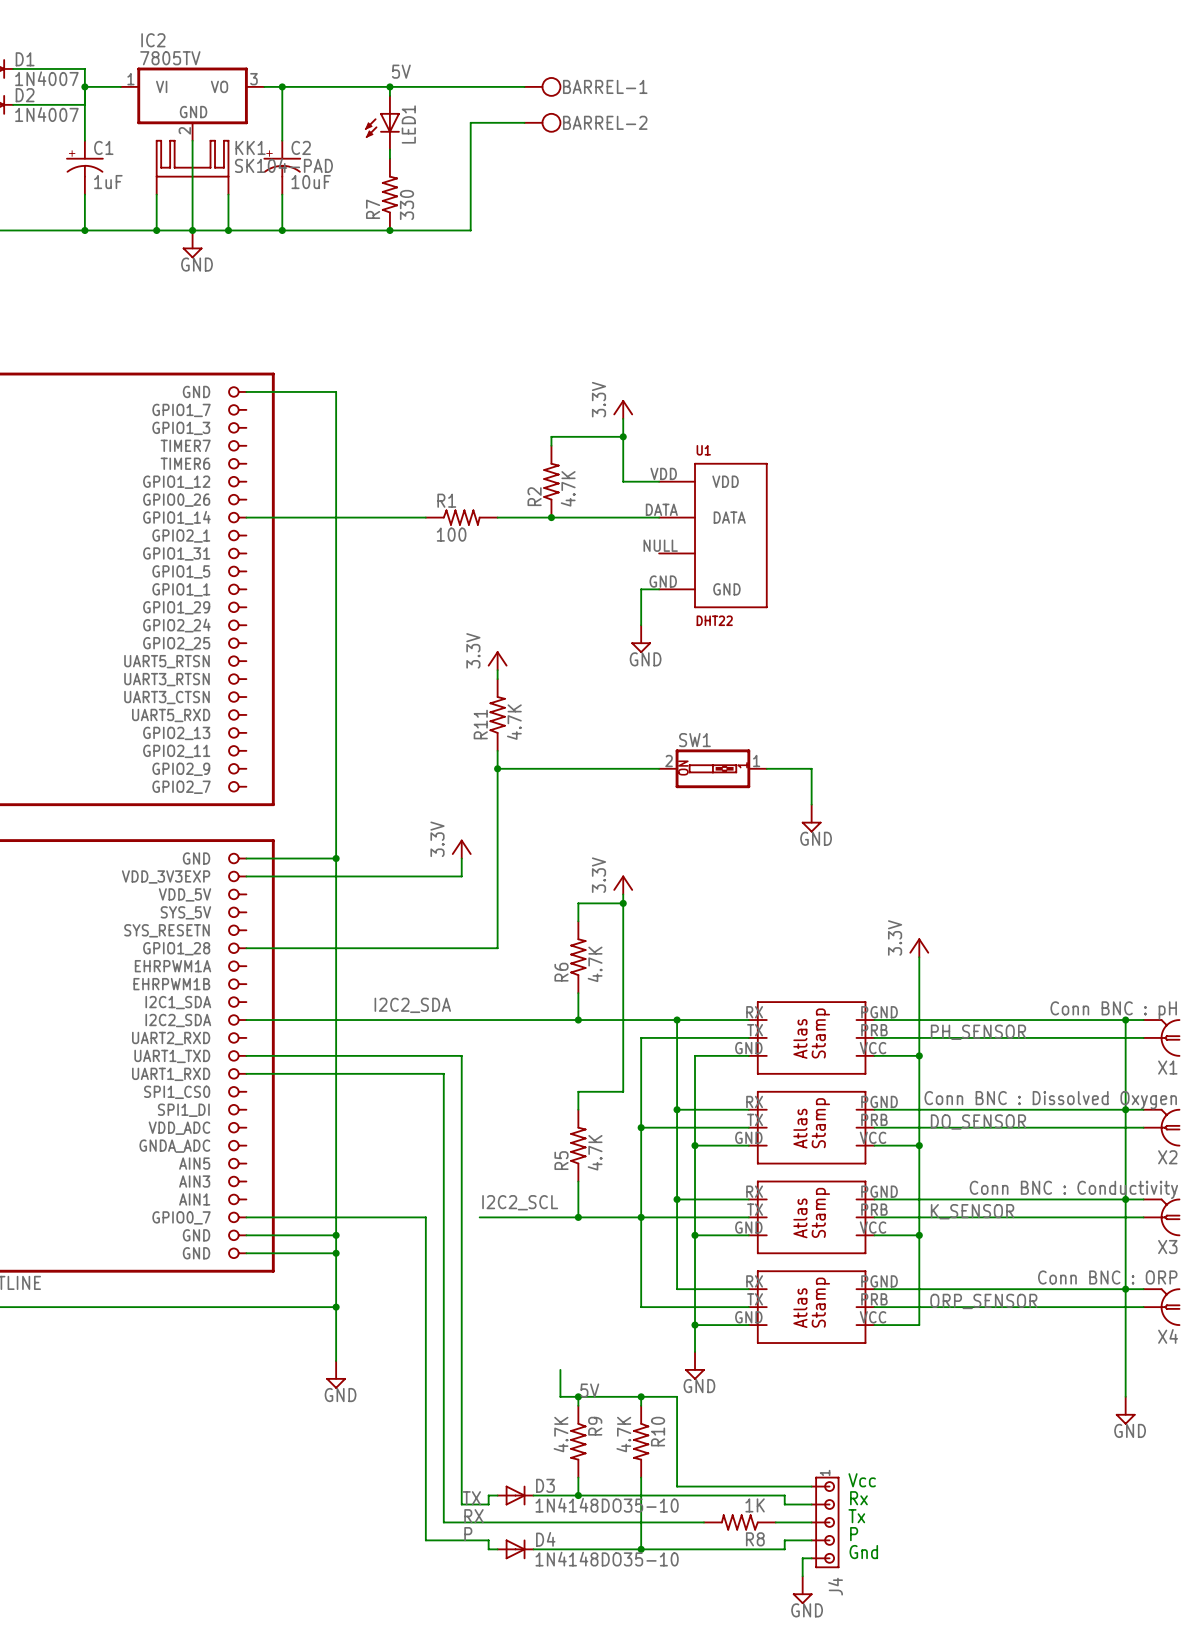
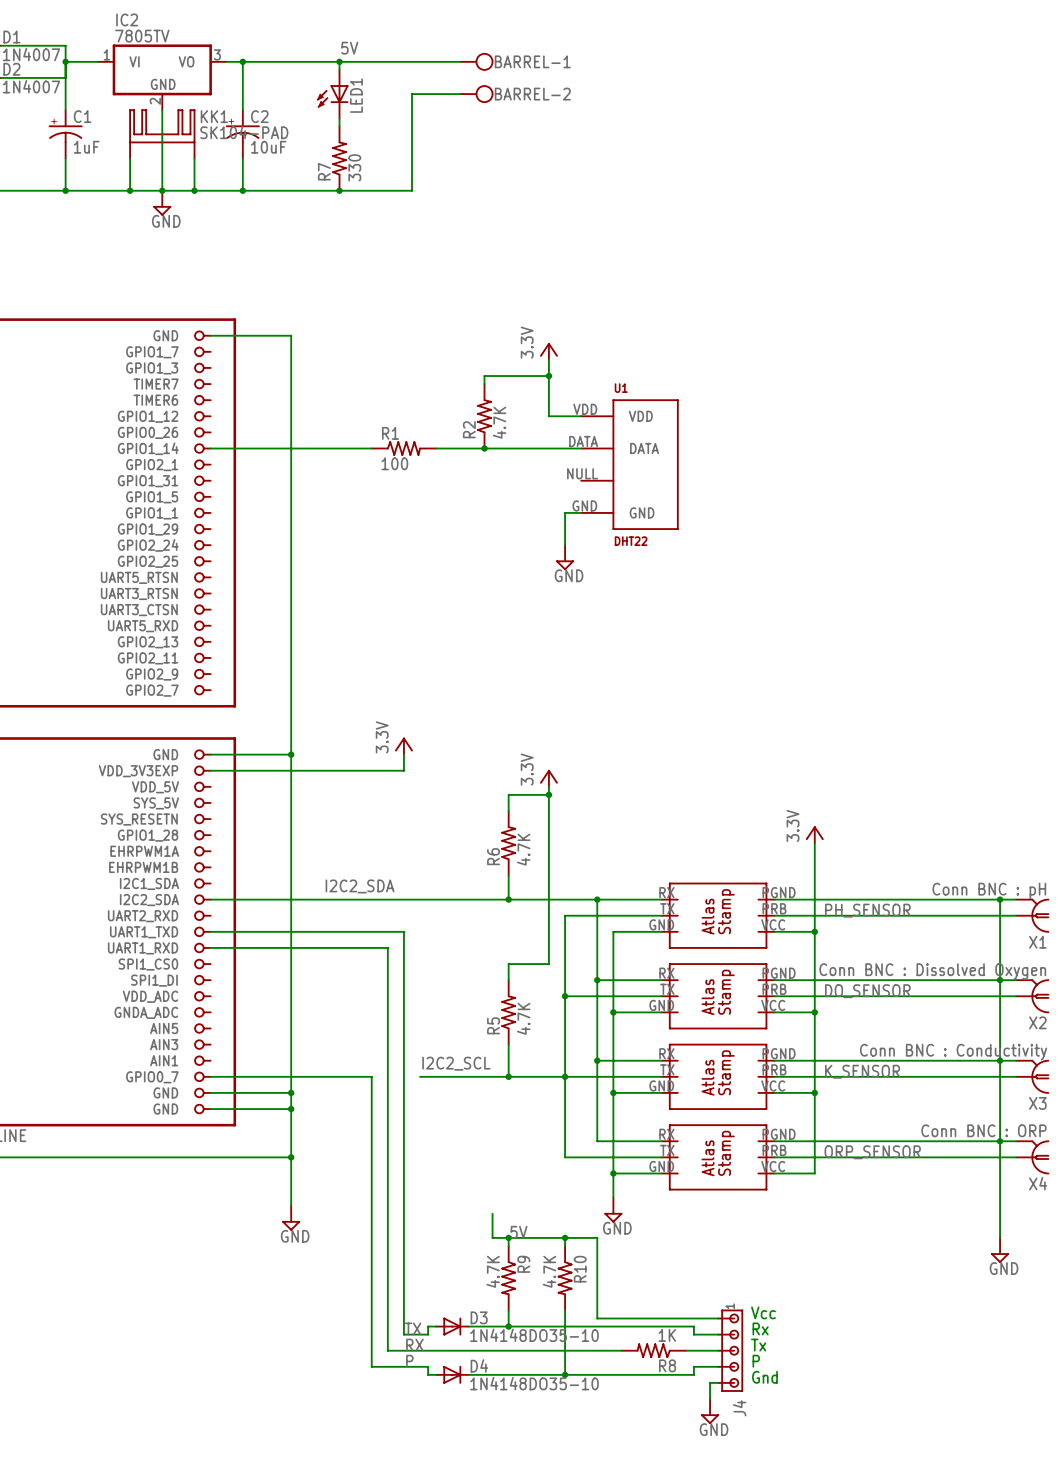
power symbol: 3.3V (497, 660) -> none
wire: (497, 670) (497, 679) -> none
R11: 4.7K (497, 714) -> none
wire: (497, 750) (497, 948) (246, 948) -> none
wire: (497, 768) (659, 768) -> none
junction: (497, 768) -> none
SW1: (712, 768) -> none
wire: (766, 768) (811, 768) (811, 804) -> none
power symbol: GND (811, 818) -> none

